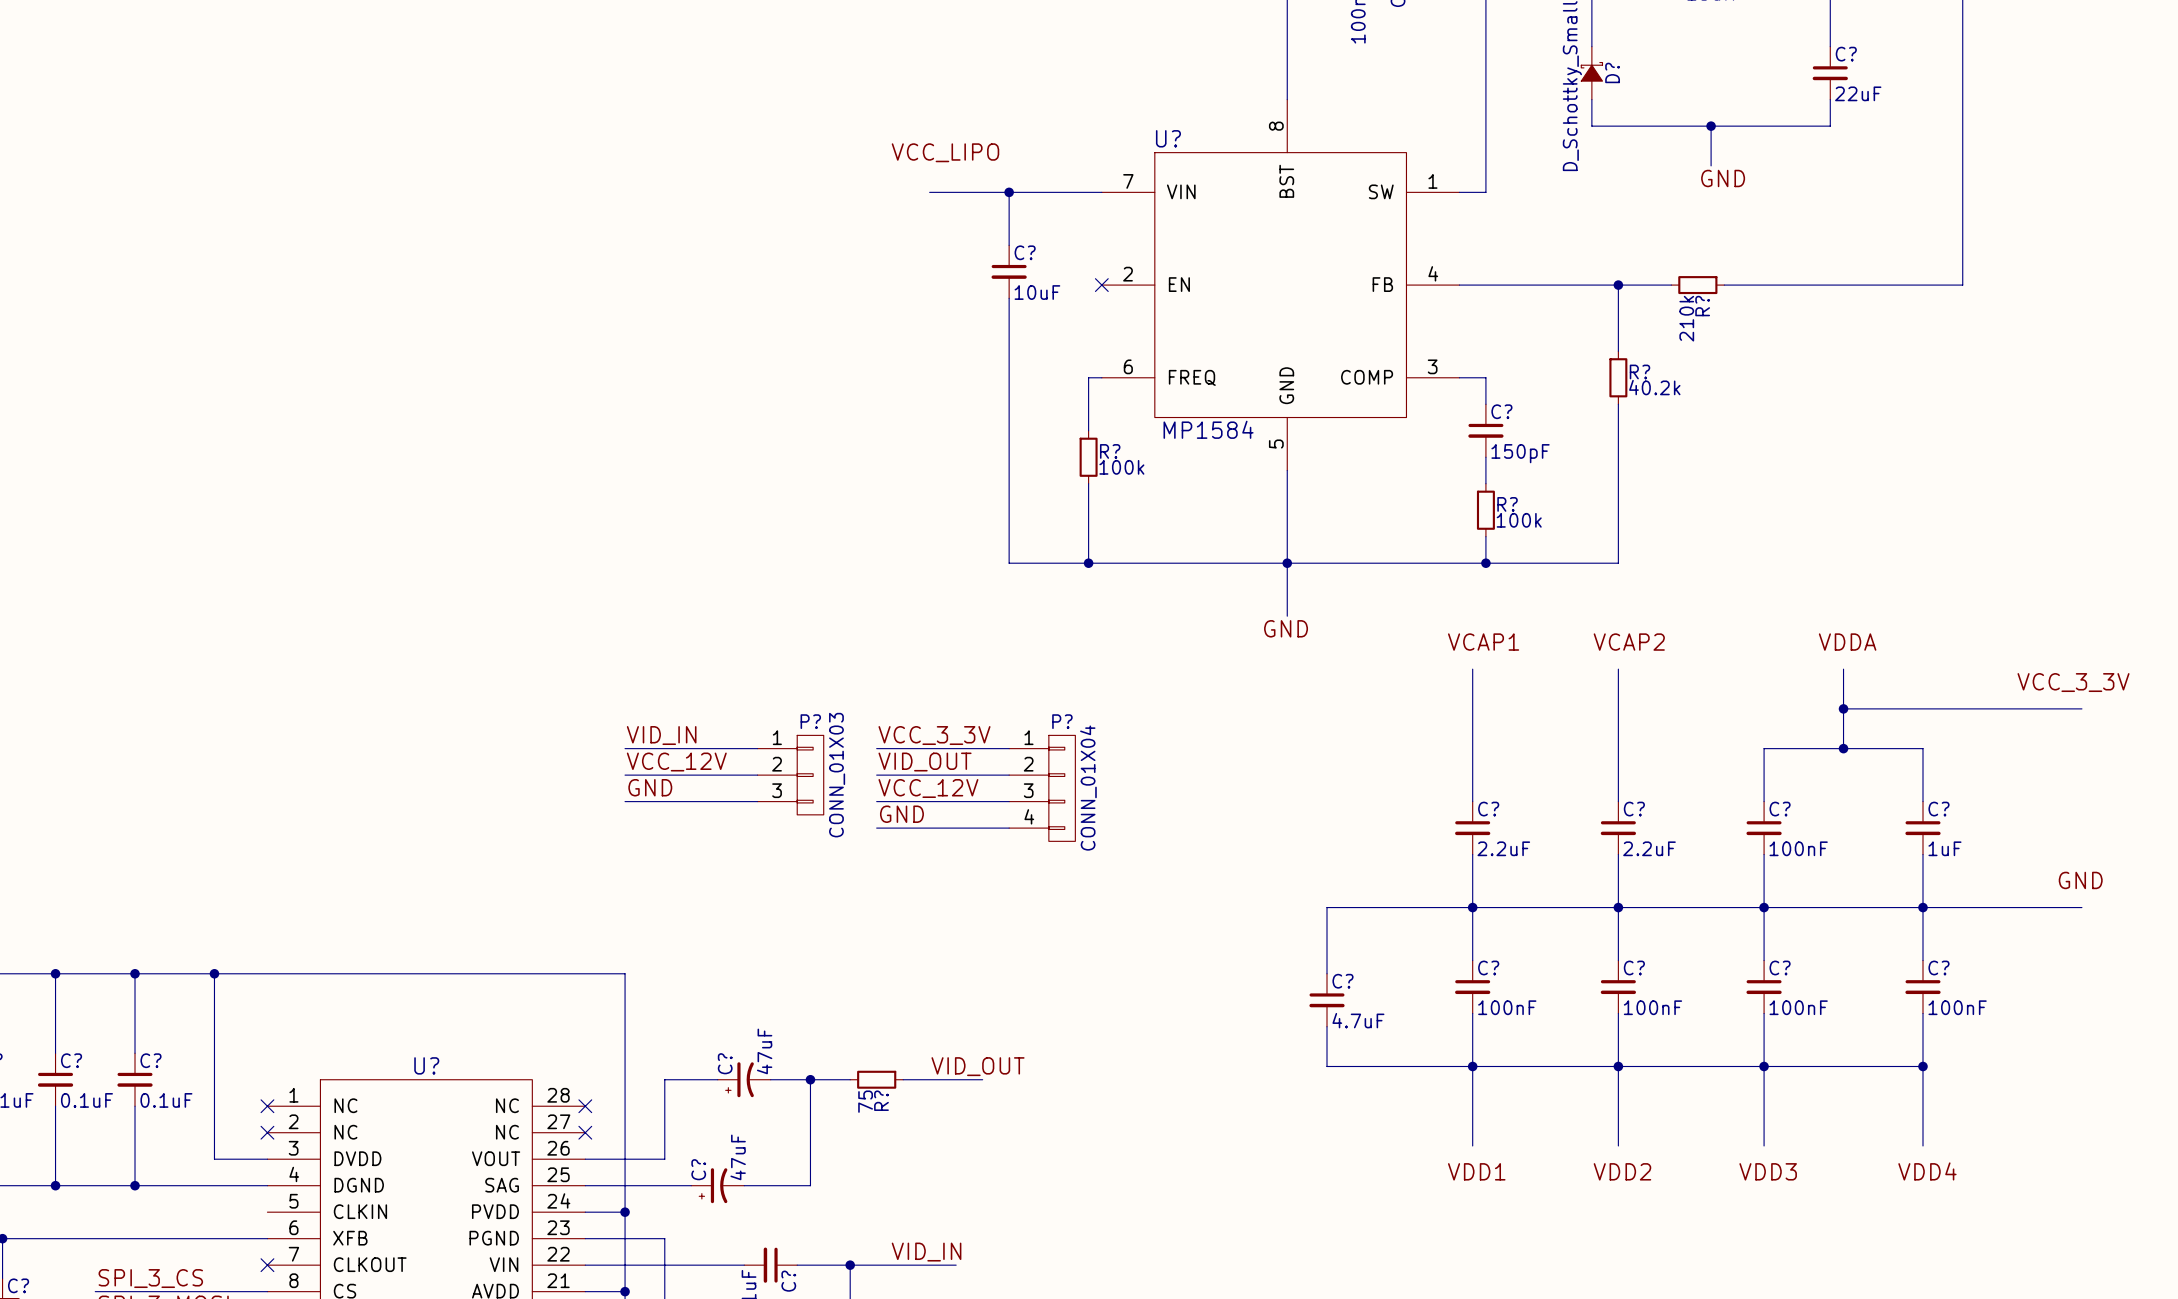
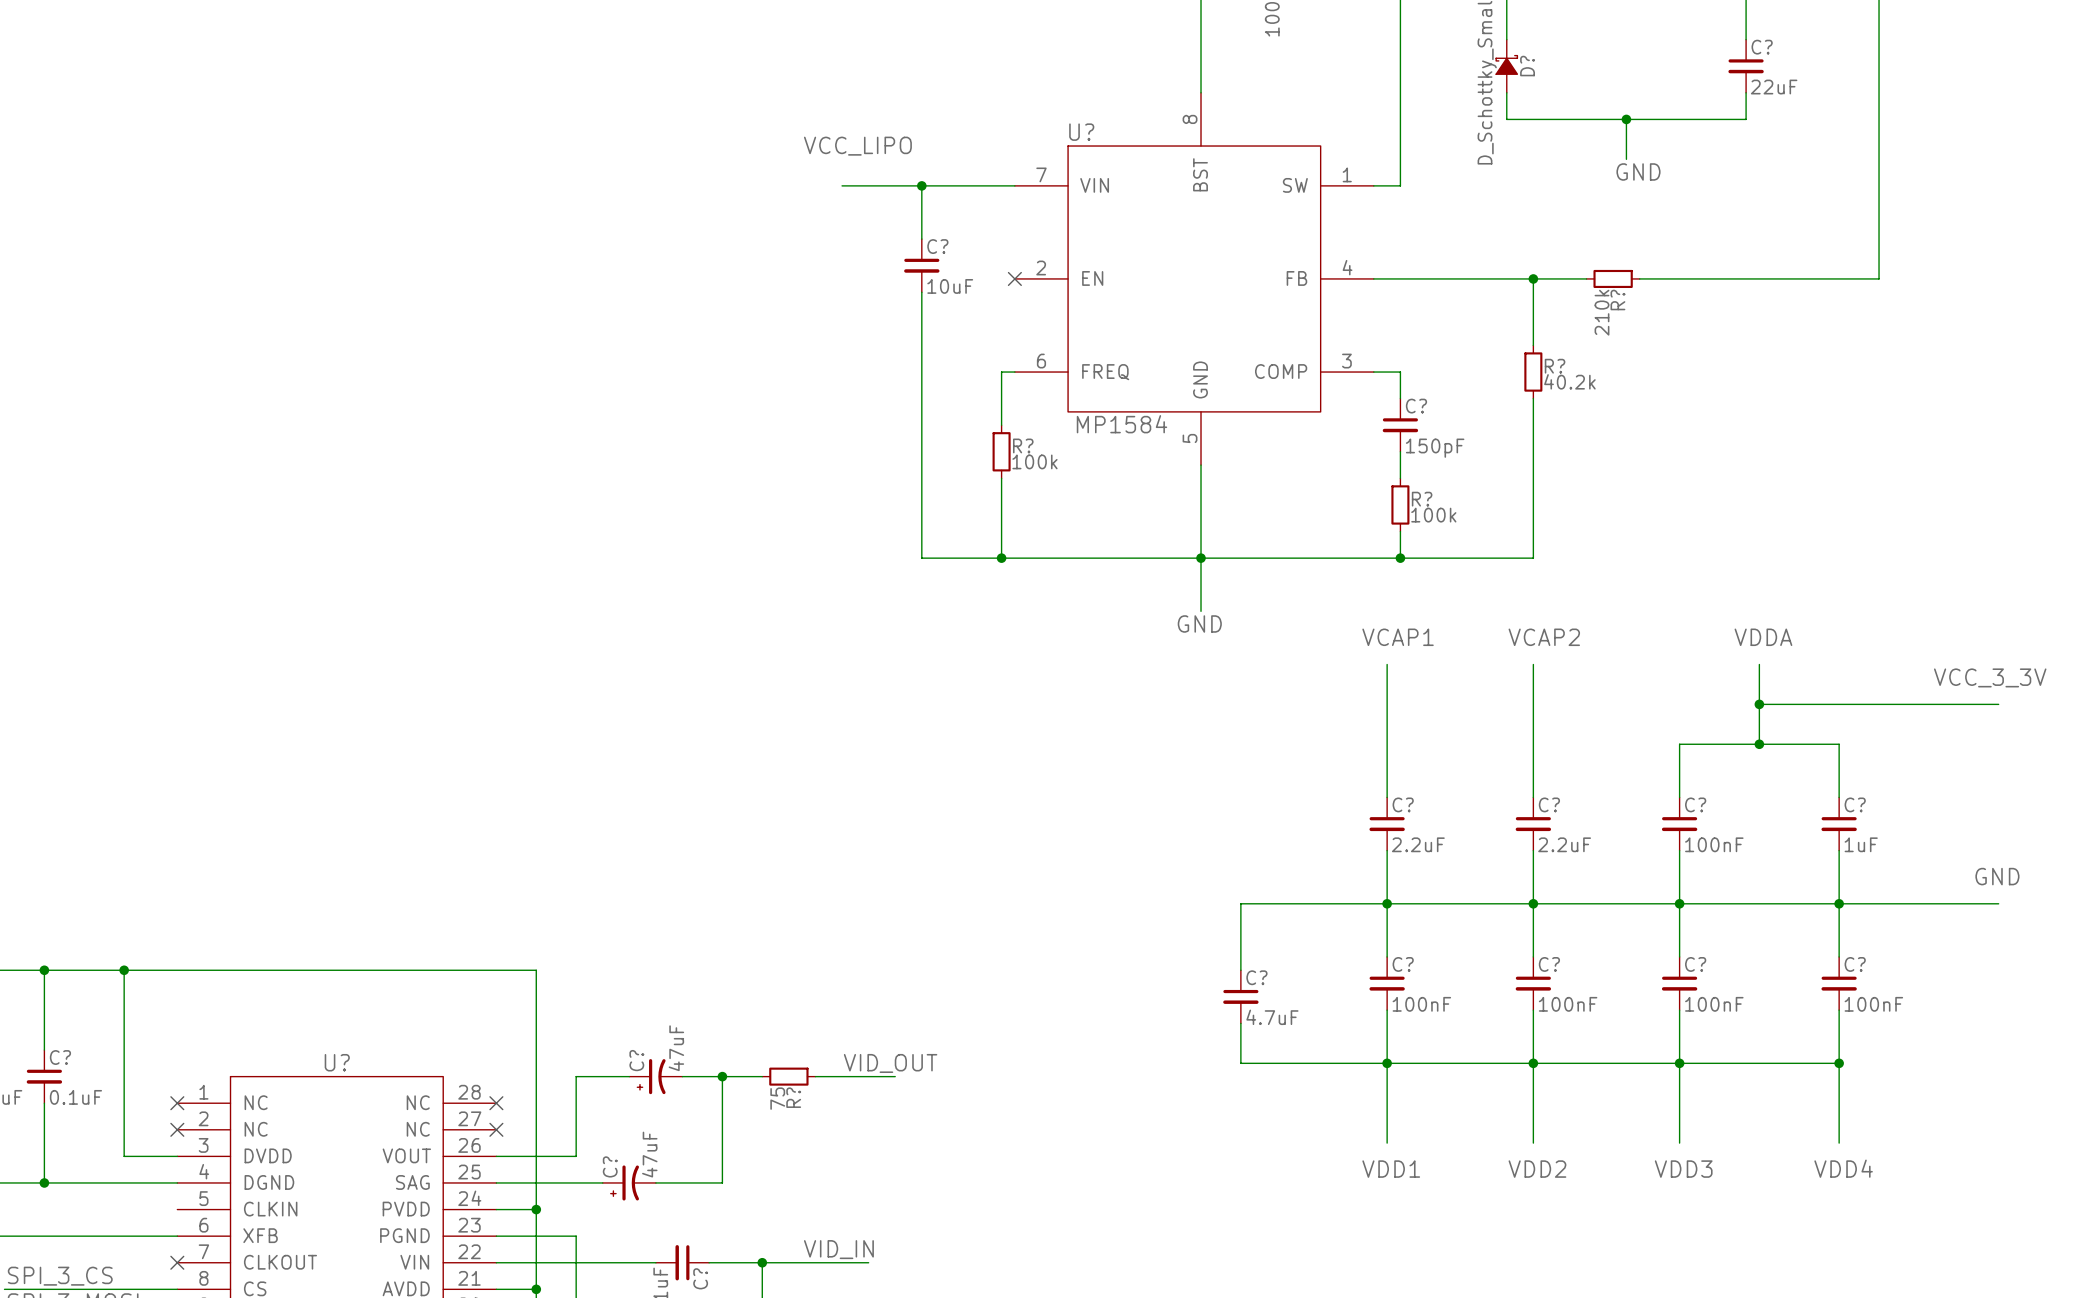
label: VID_IN (661, 735) -> none
label: VCC_3_3V (934, 735) -> none
wire: (625, 748) (757, 748) -> none
wire: (876, 748) (1009, 748) -> none
label: VCC_12V (676, 762) -> none
label: VID_OUT (925, 762) -> none
wire: (625, 775) (757, 775) -> none
P?: CONN_01X03 (790, 775) -> none
wire: (876, 775) (1009, 775) -> none
label: GND (650, 787) -> none
label: VCC_12V (928, 788) -> none
P?: CONN_01X04 (1042, 788) -> none
wire: (625, 801) (757, 801) -> none
wire: (876, 801) (1009, 801) -> none
label: GND (901, 814) -> none
wire: (876, 828) (1009, 828) -> none

